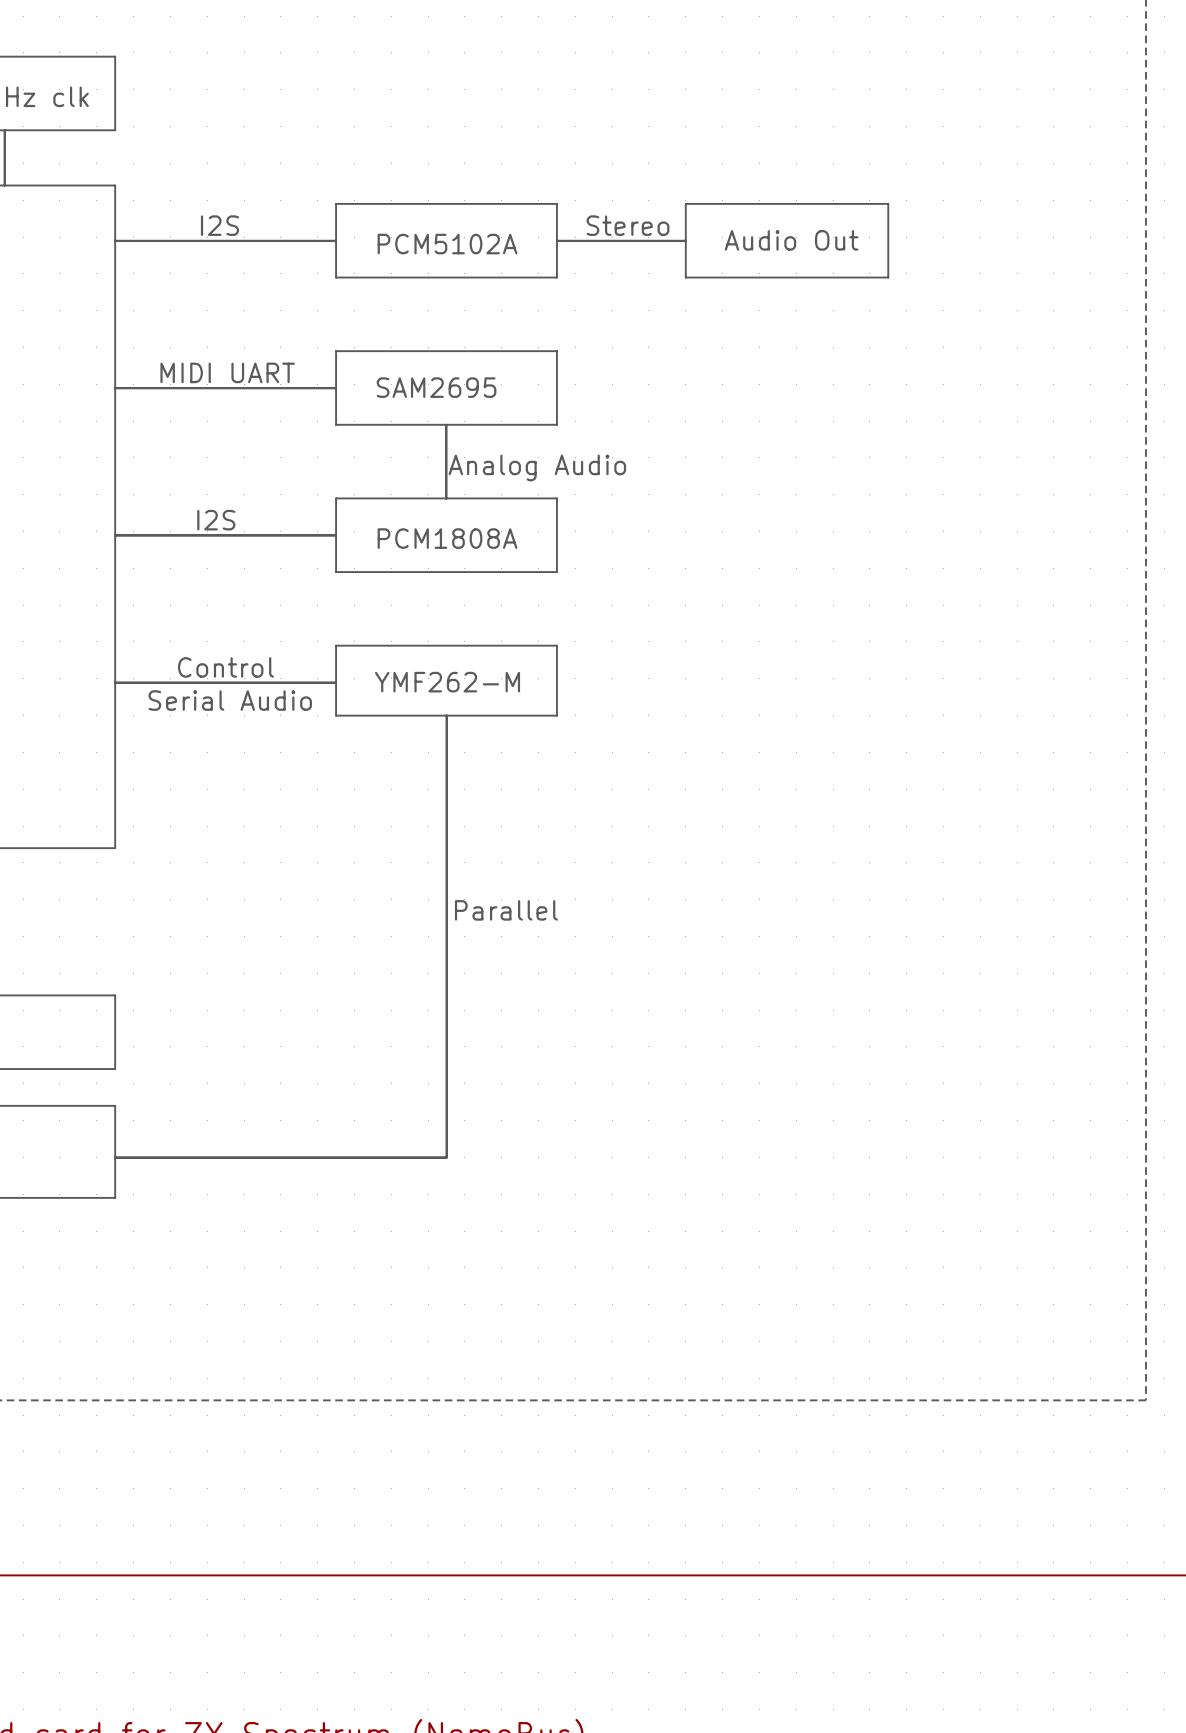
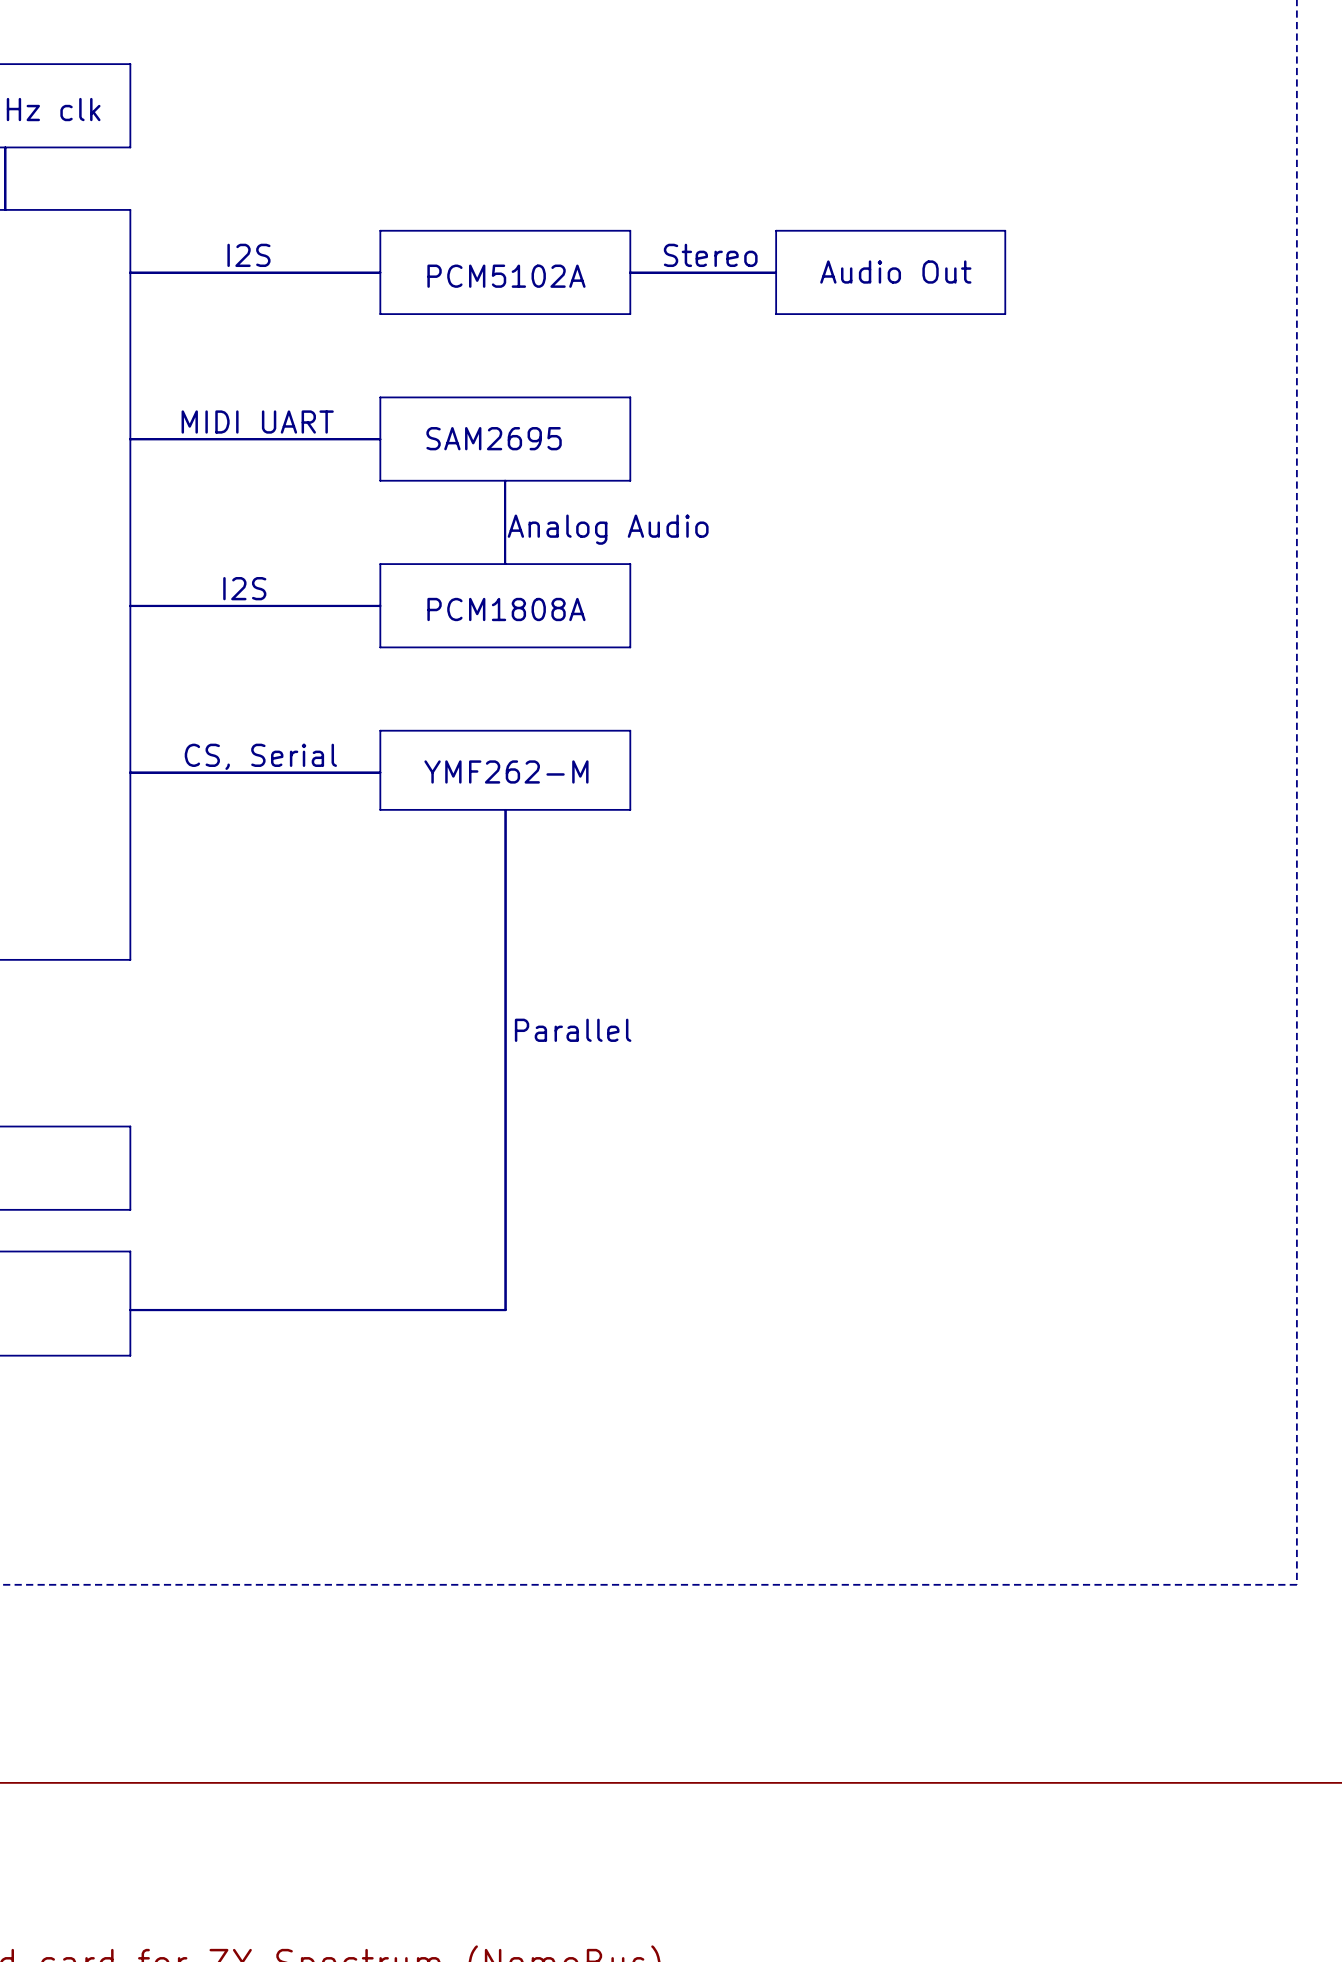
text: Control (225, 667) -> none
text: none -> CS, Serial (260, 756)
text: Serial Audio (230, 700) -> none

